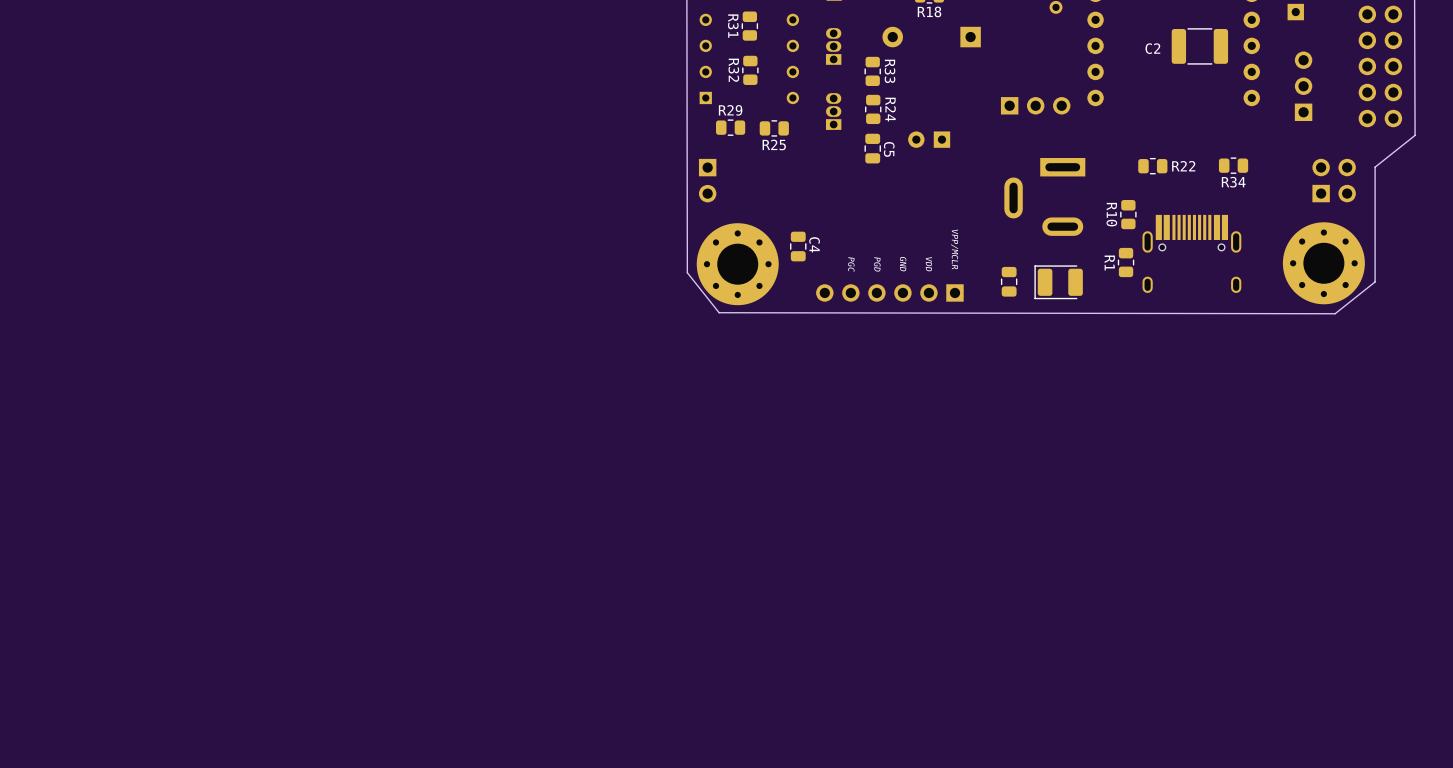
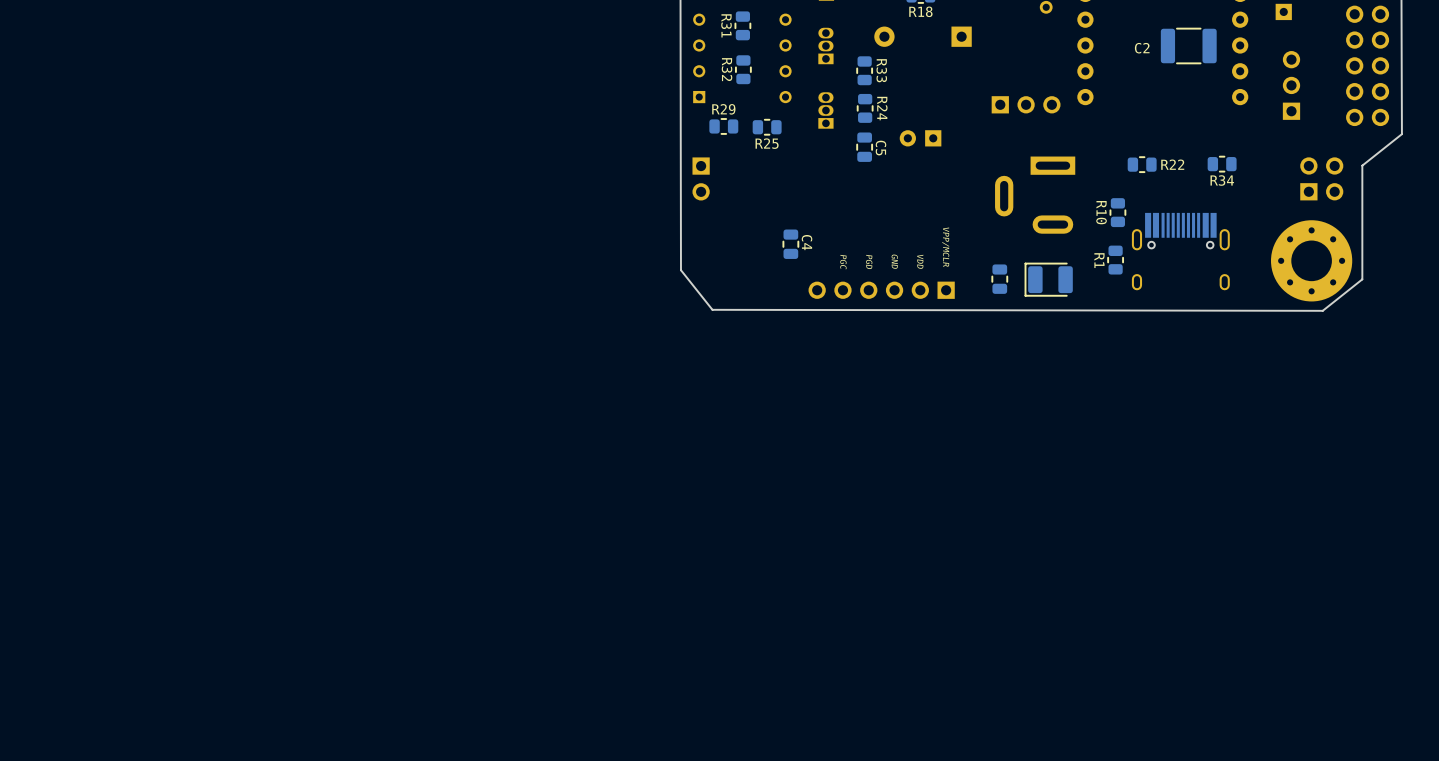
part: (737, 264) -> none

